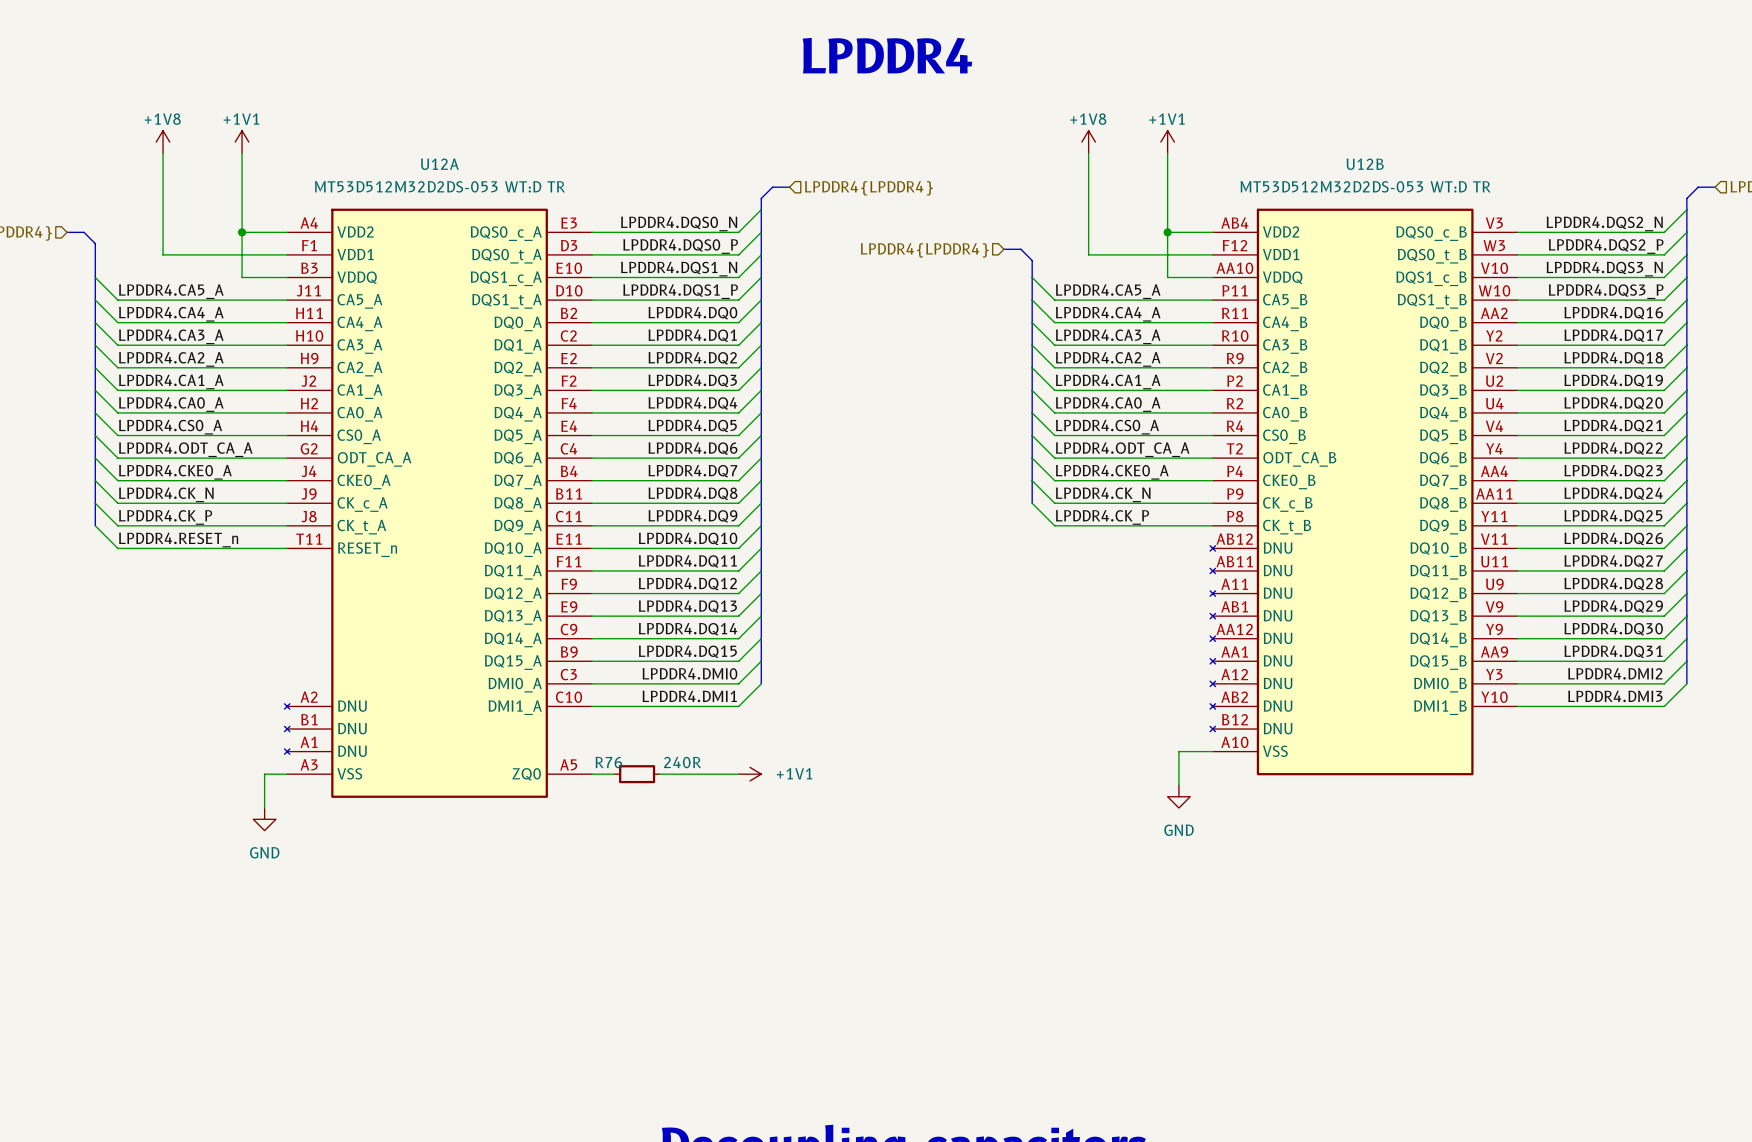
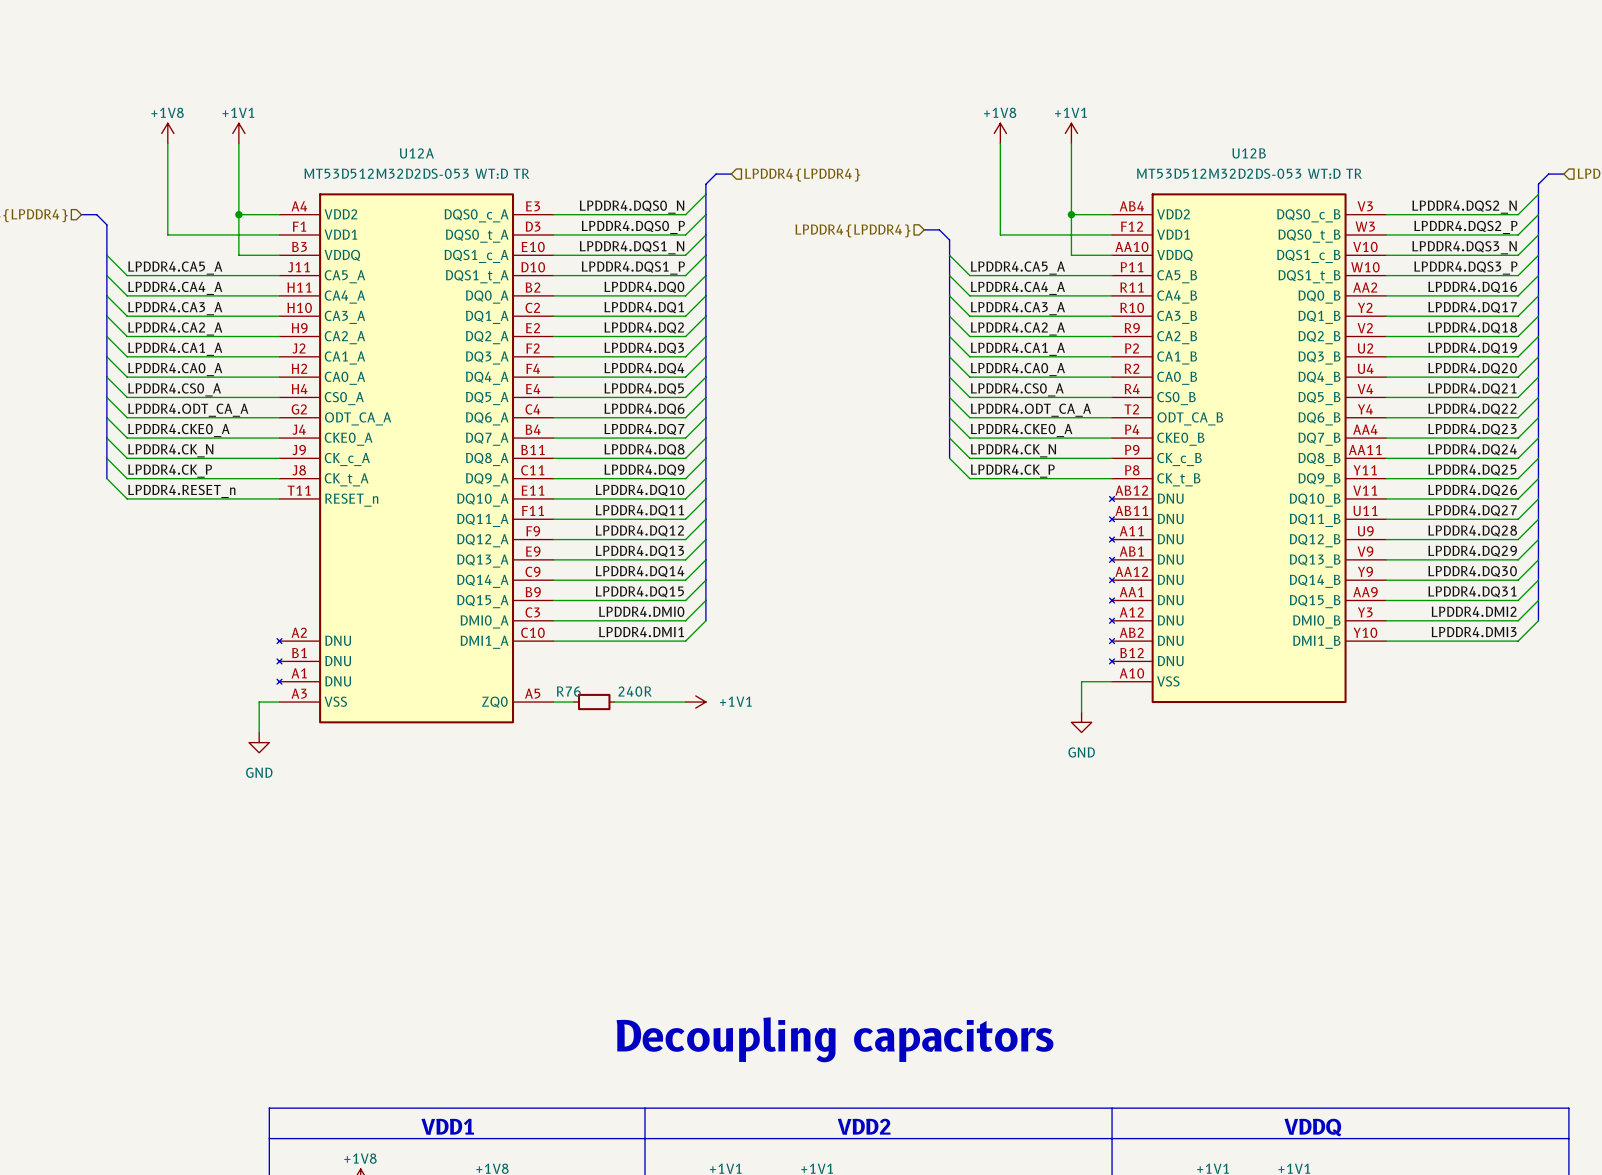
text: LPDDR4 (887, 55) -> none

